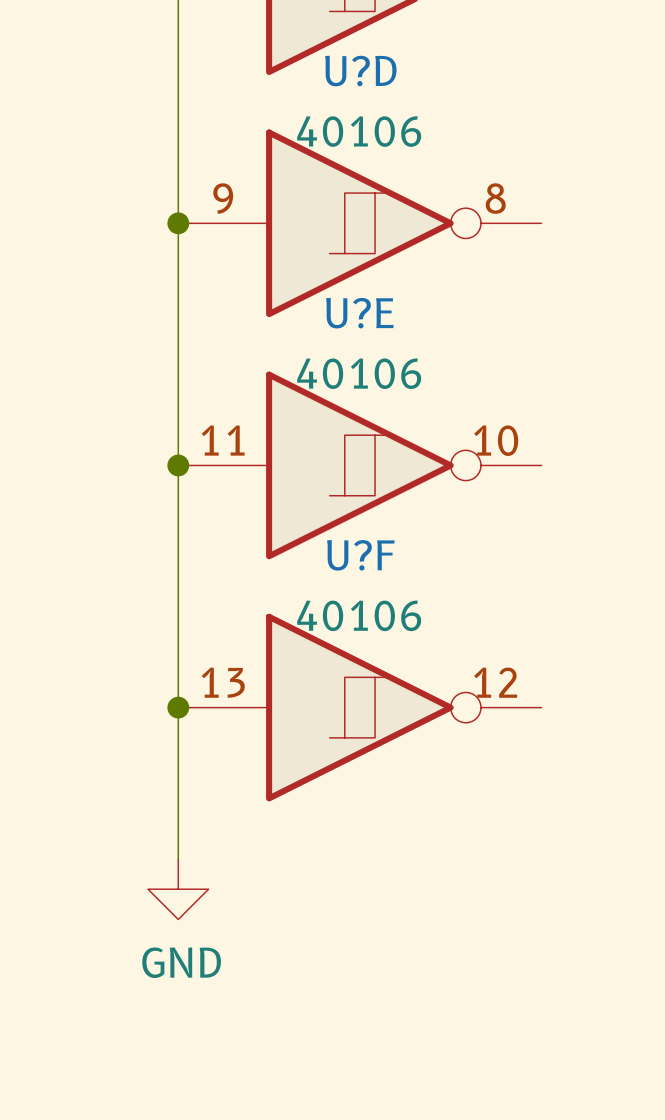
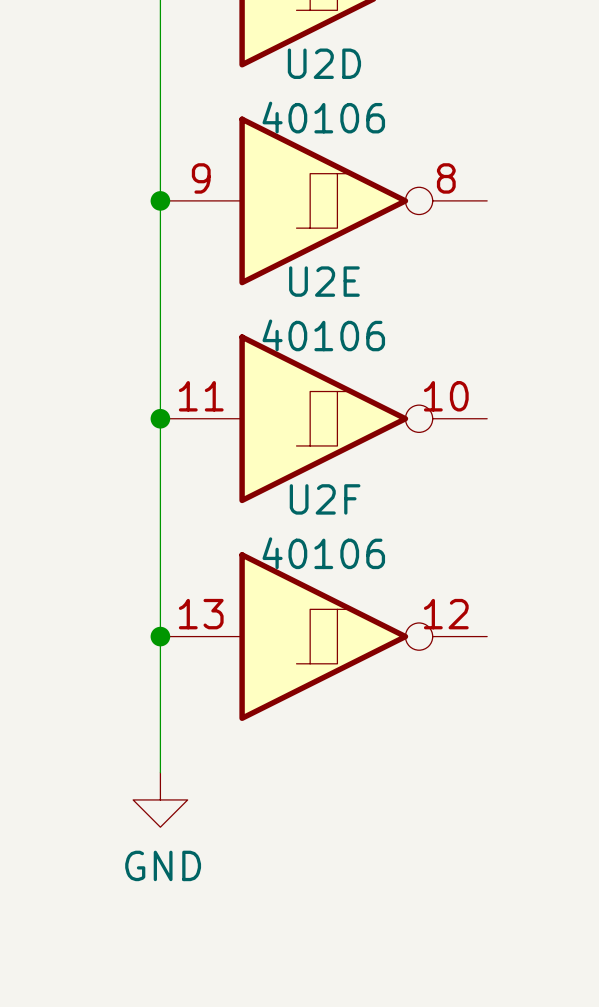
U?D name: U?D (360, 71) -> U2D (324, 63)
U?E name: U?E (359, 313) -> U2E (324, 281)
U?F name: U?F (360, 555) -> U2F (325, 499)

